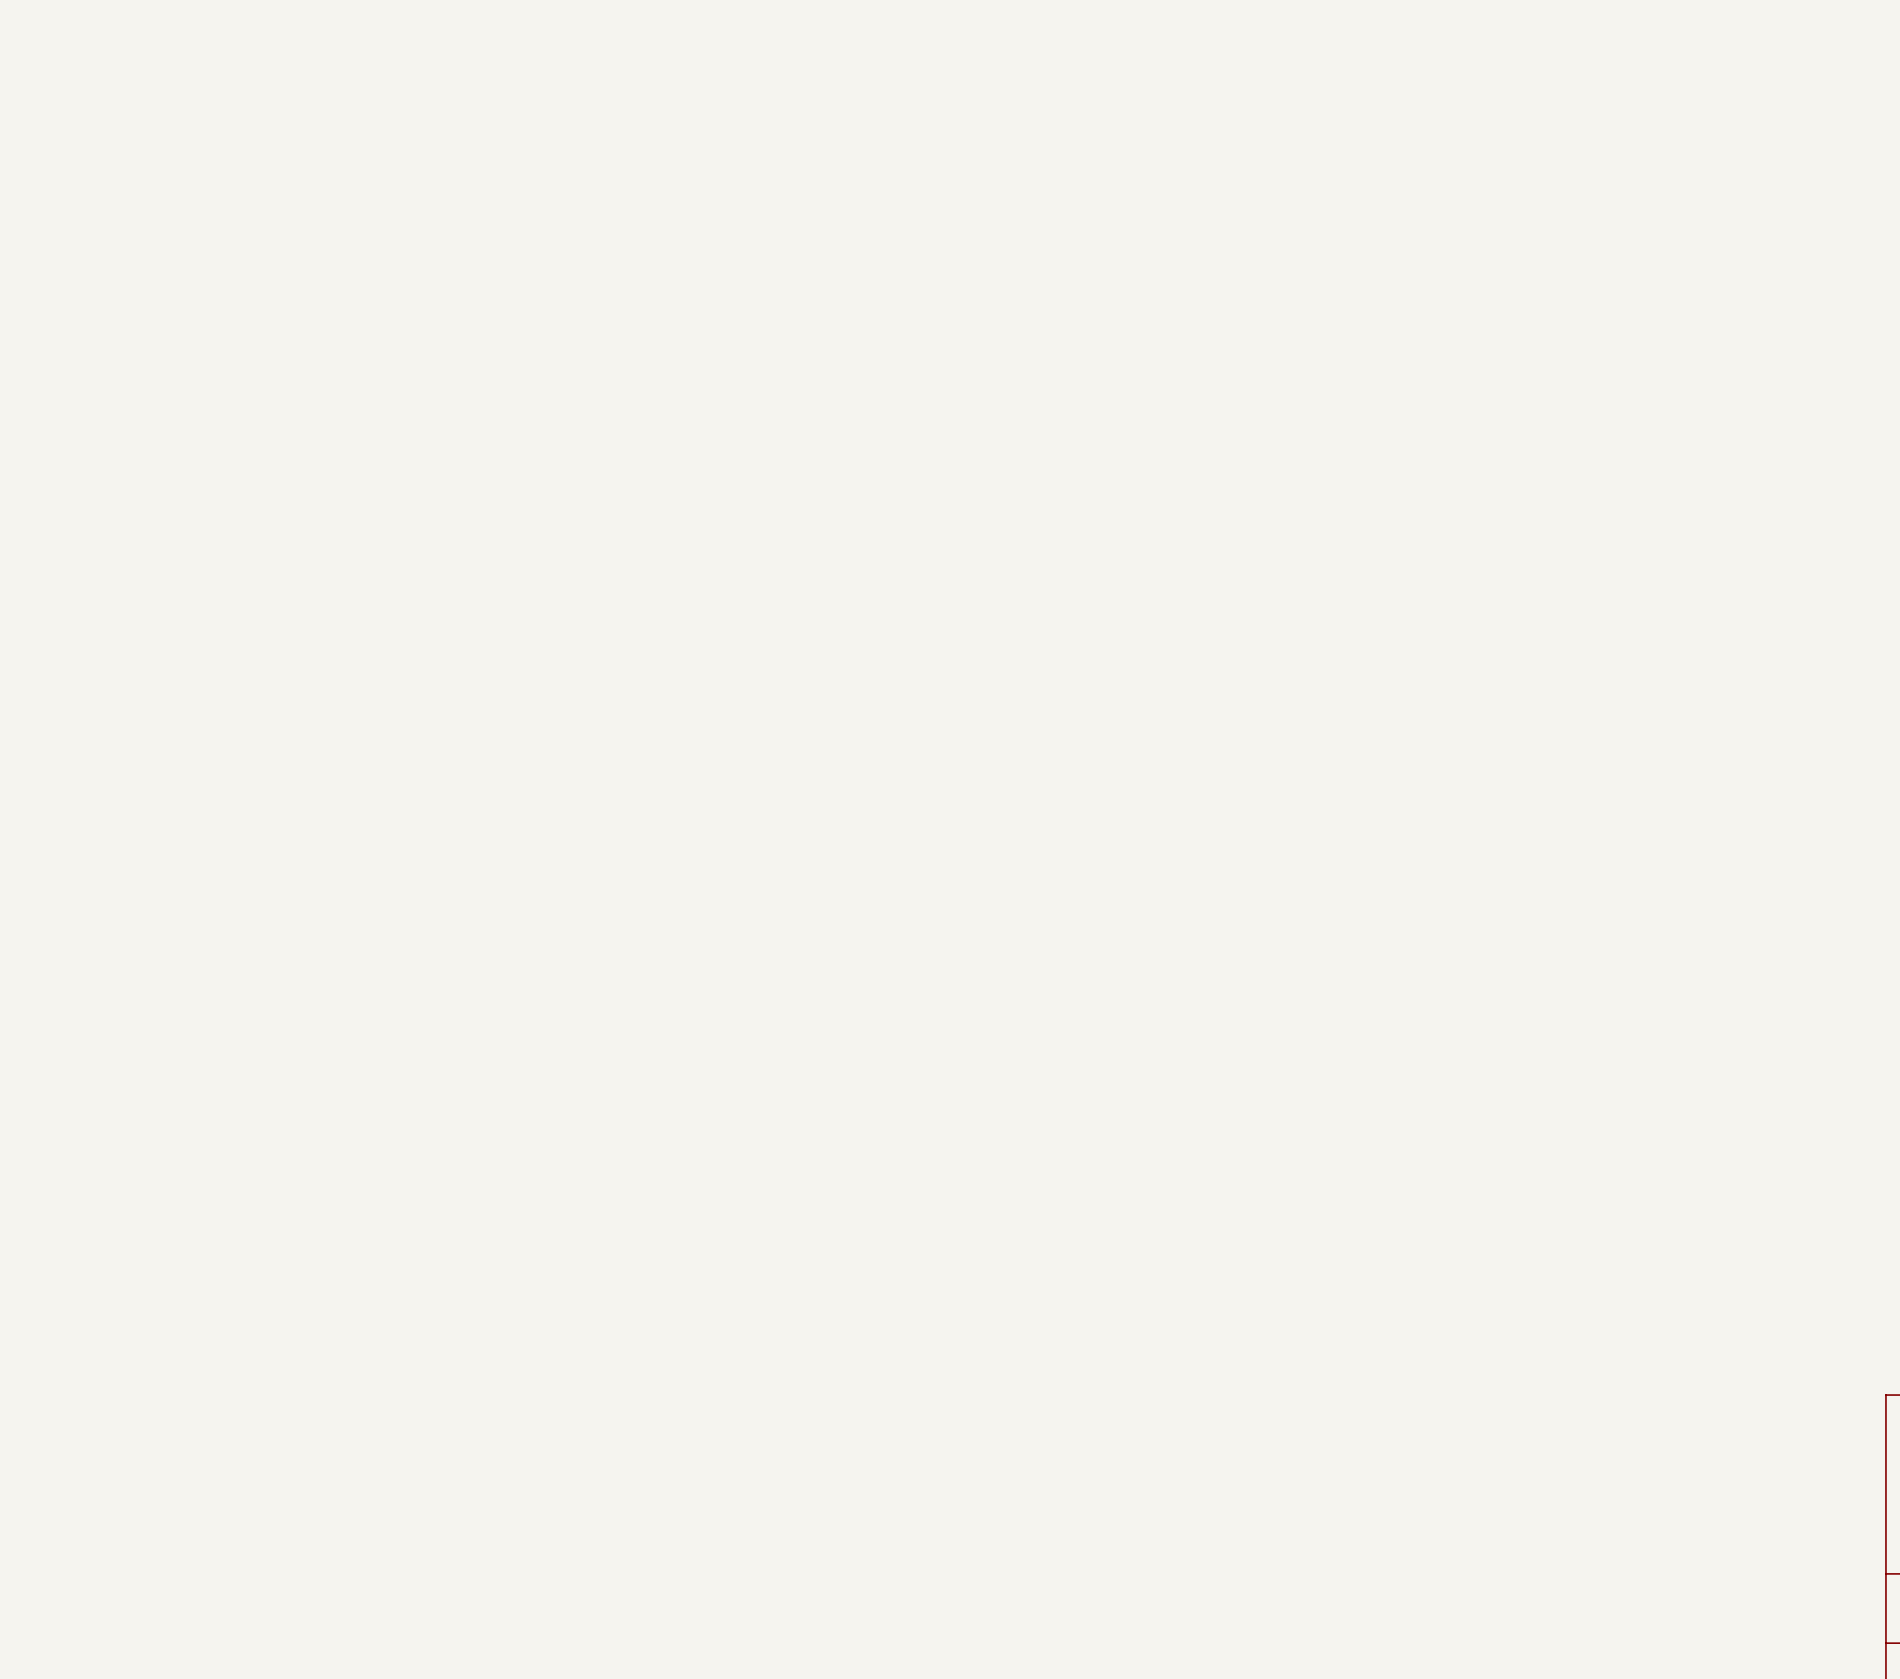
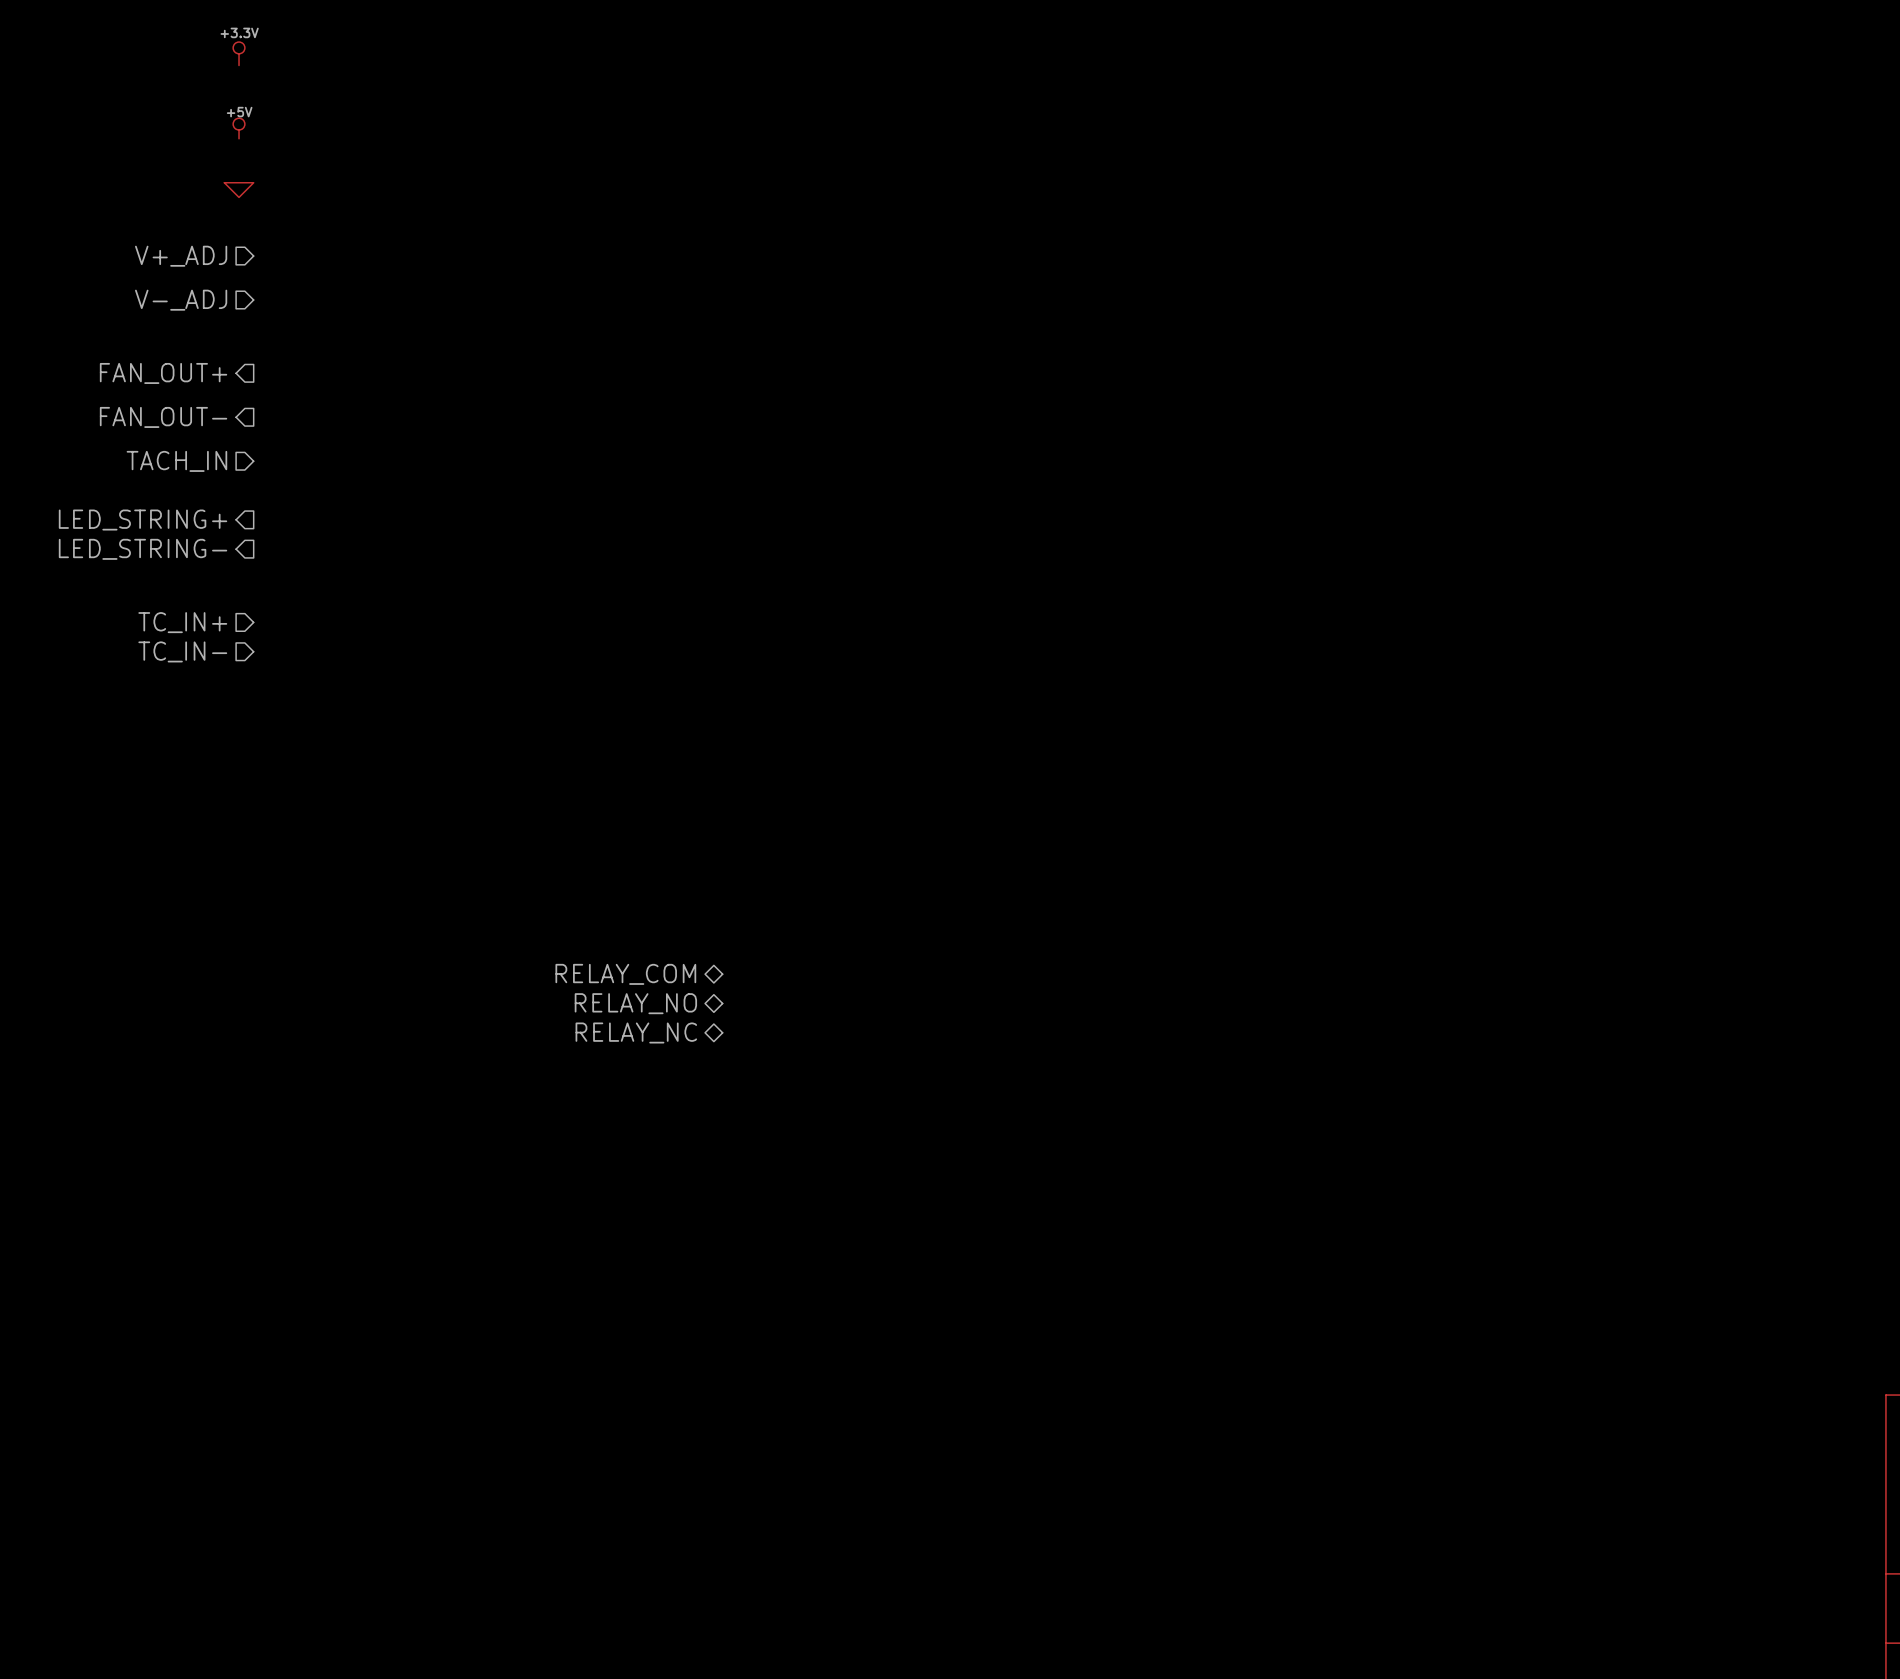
power symbol: none -> +3.3V (239, 53)
power symbol: none -> +5V (239, 128)
power symbol: none -> (239, 190)
hierarchical label: none -> V+_ADJ (181, 256)
hierarchical label: none -> V-_ADJ (181, 300)
hierarchical label: none -> FAN_OUT+ (163, 373)
hierarchical label: none -> FAN_OUT- (163, 417)
hierarchical label: none -> TACH_IN (176, 461)
hierarchical label: none -> LED_STRING+ (143, 520)
hierarchical label: none -> LED_STRING- (143, 549)
hierarchical label: none -> TC_IN+ (182, 622)
hierarchical label: none -> TC_IN- (182, 651)
hierarchical label: none -> RELAY_COM (625, 974)
hierarchical label: none -> RELAY_NO (635, 1003)
hierarchical label: none -> RELAY_NC (636, 1032)

